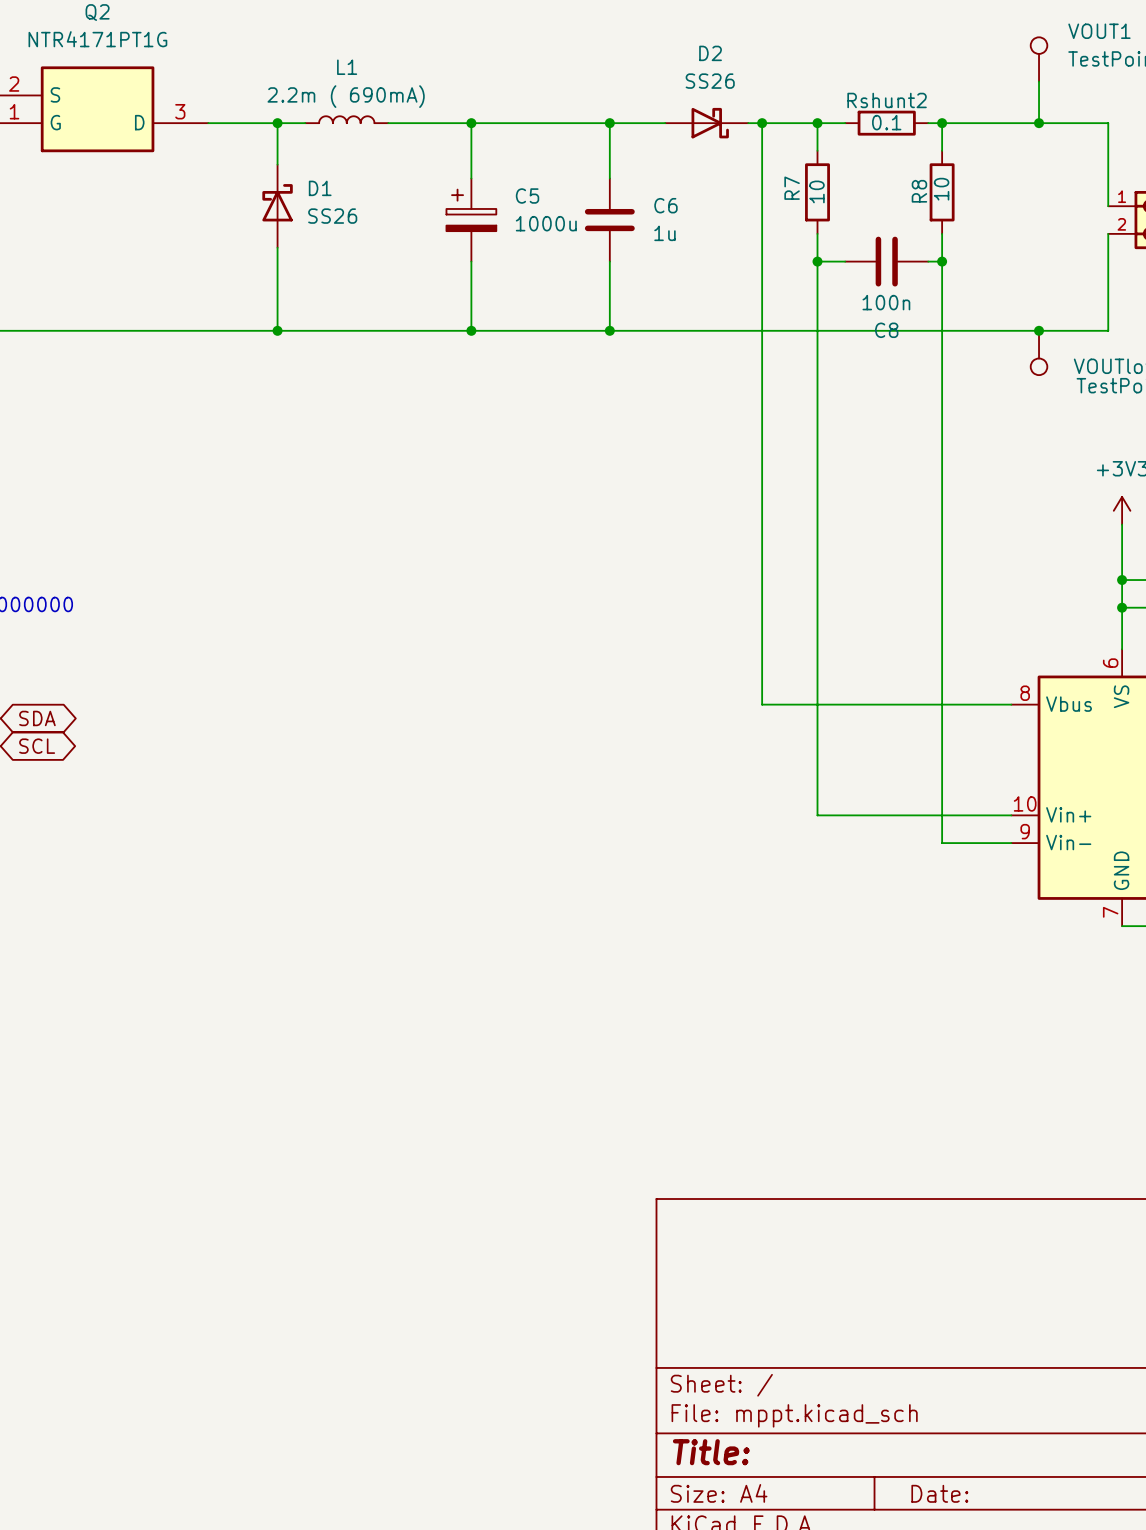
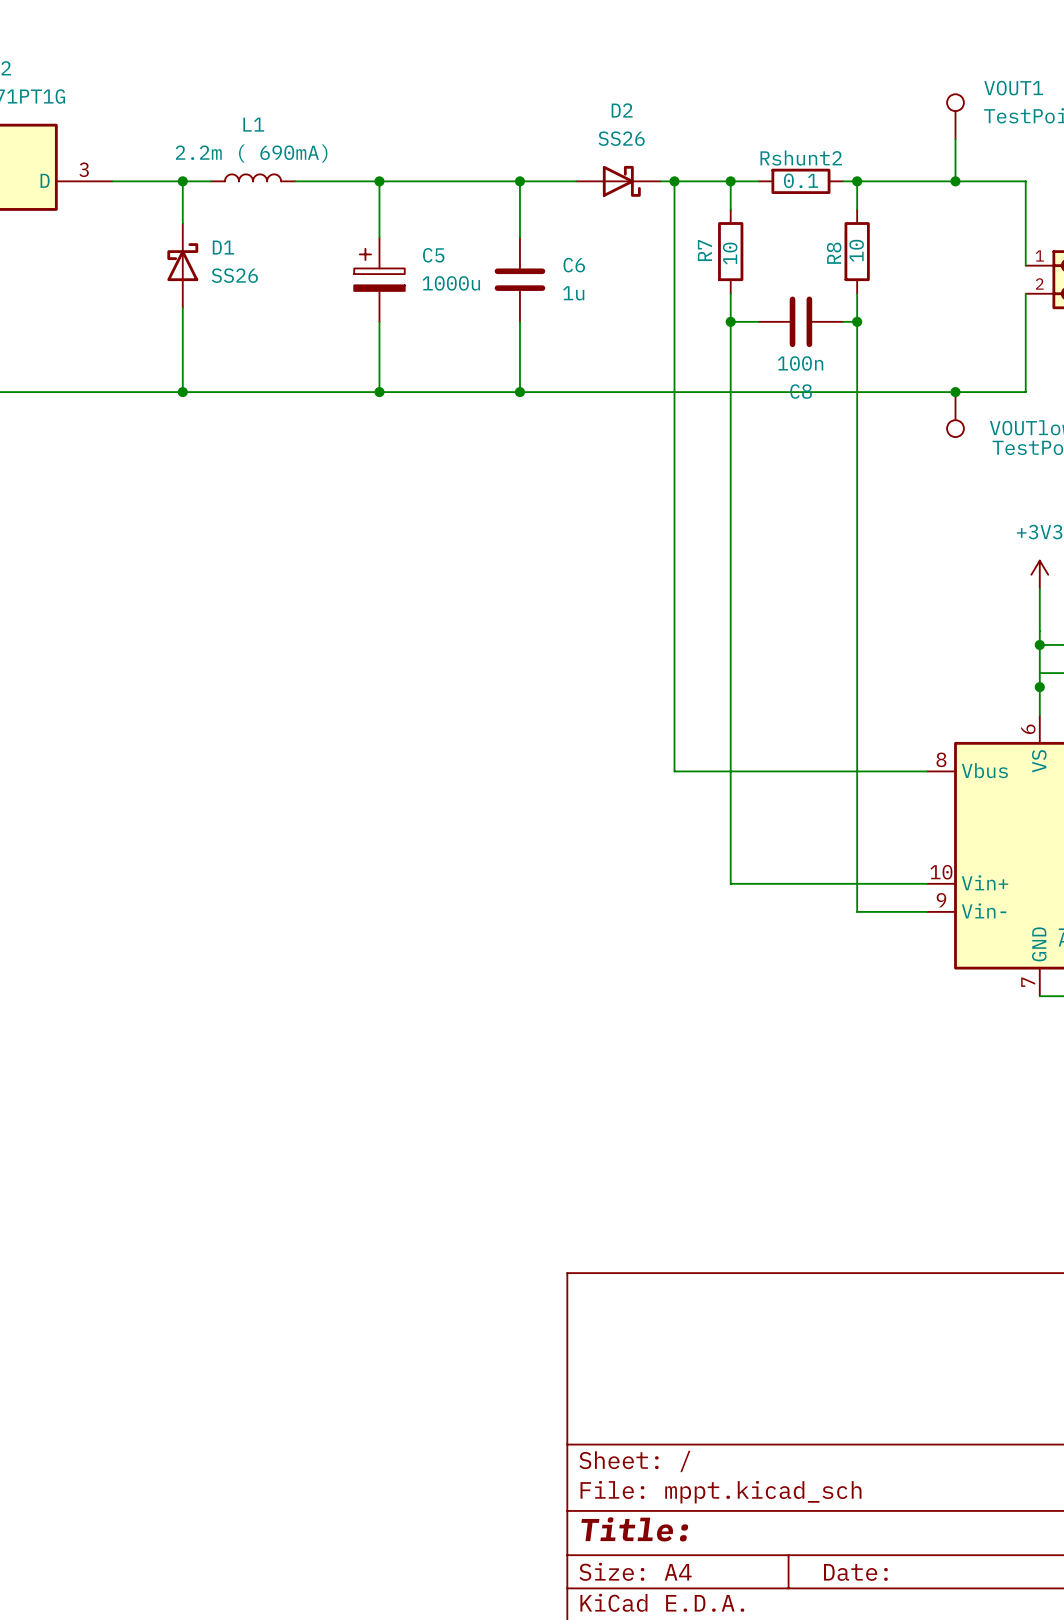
junction position: (1122, 607) -> (1039, 687)

